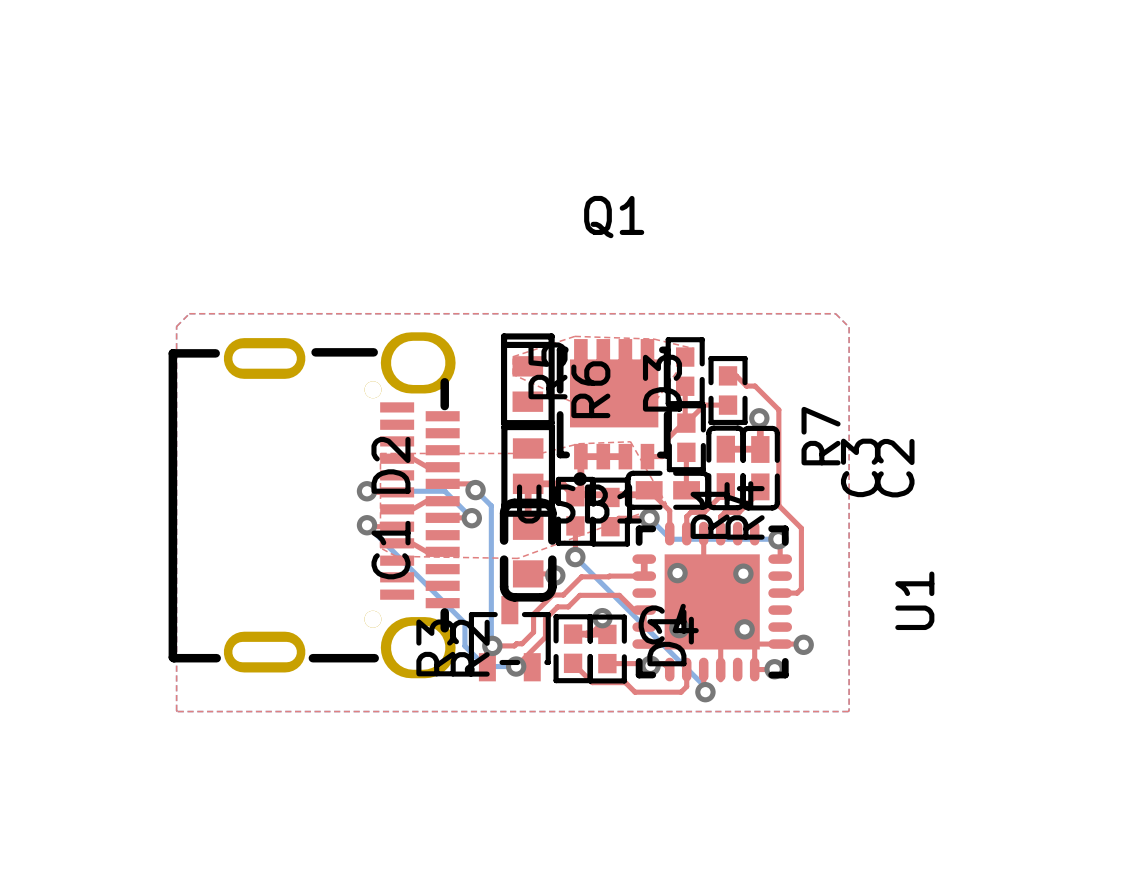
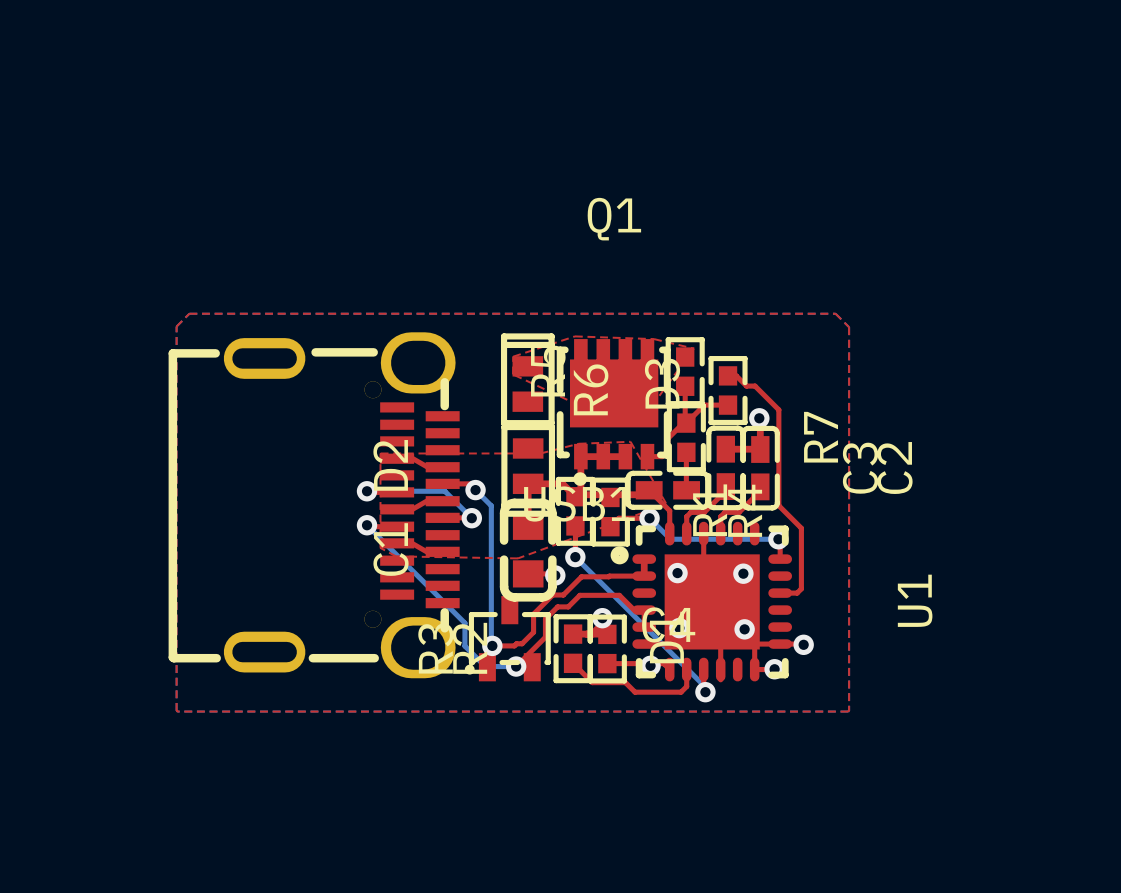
drawing: none -> [610, 546, 629, 565]

